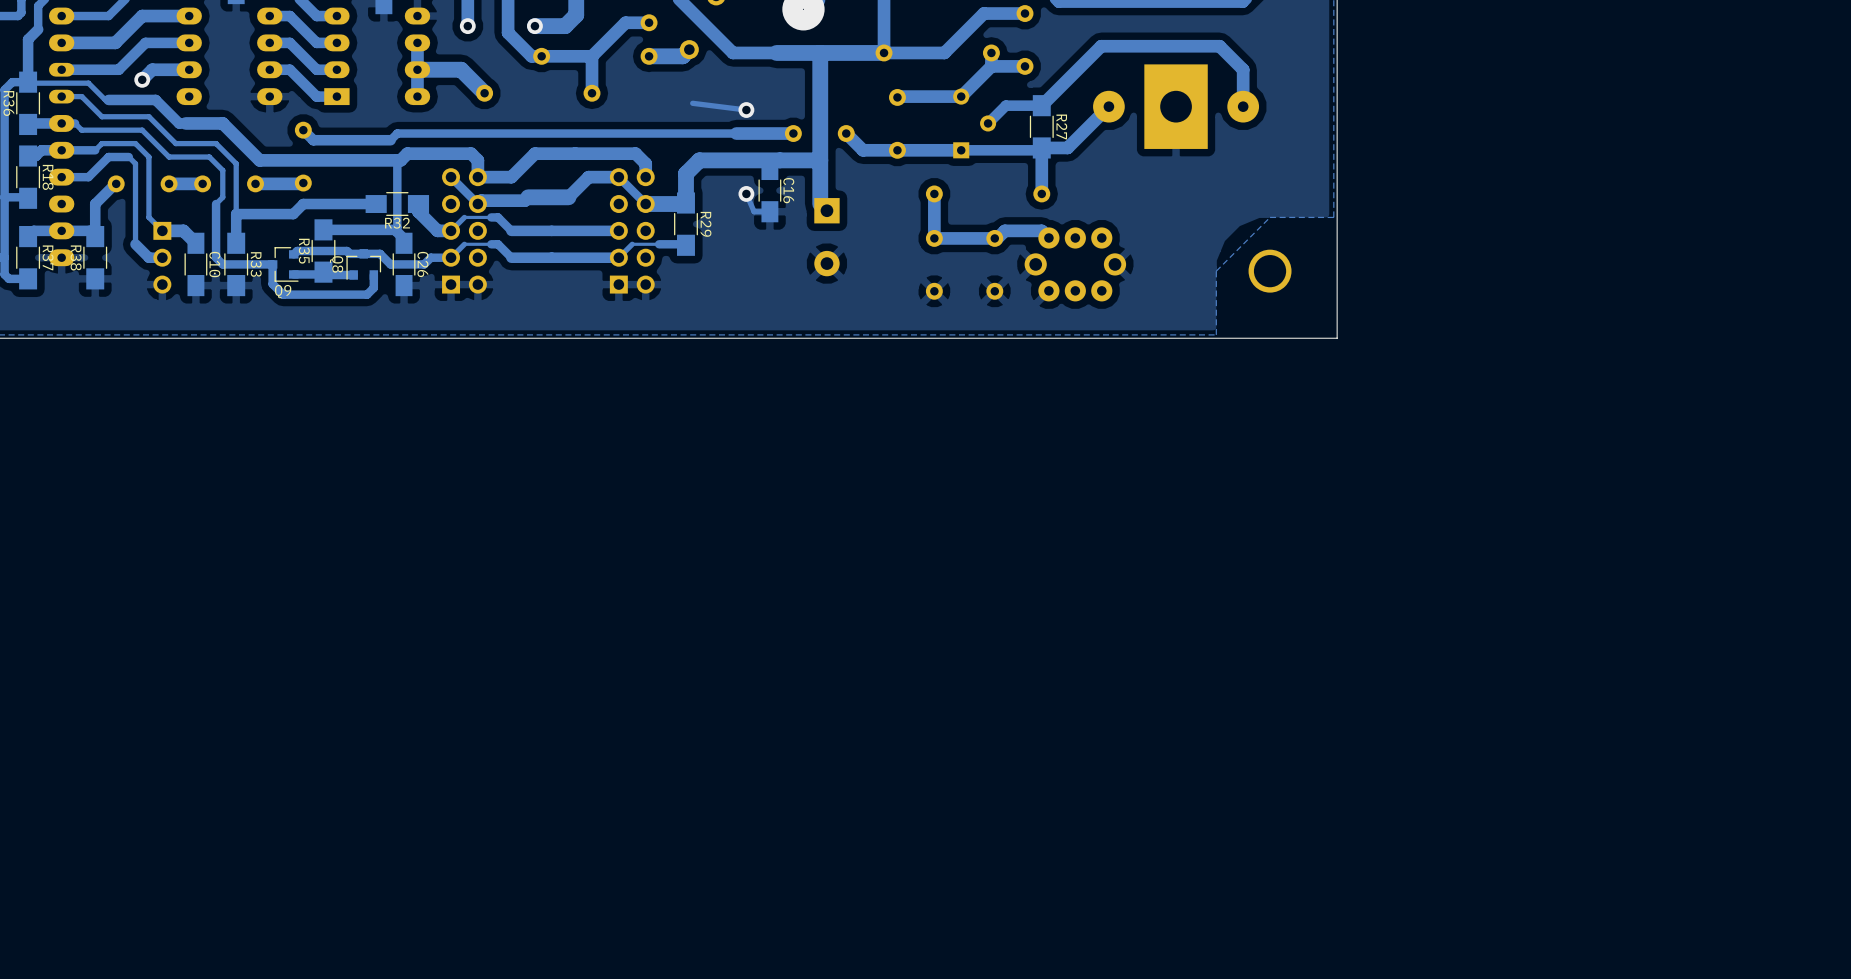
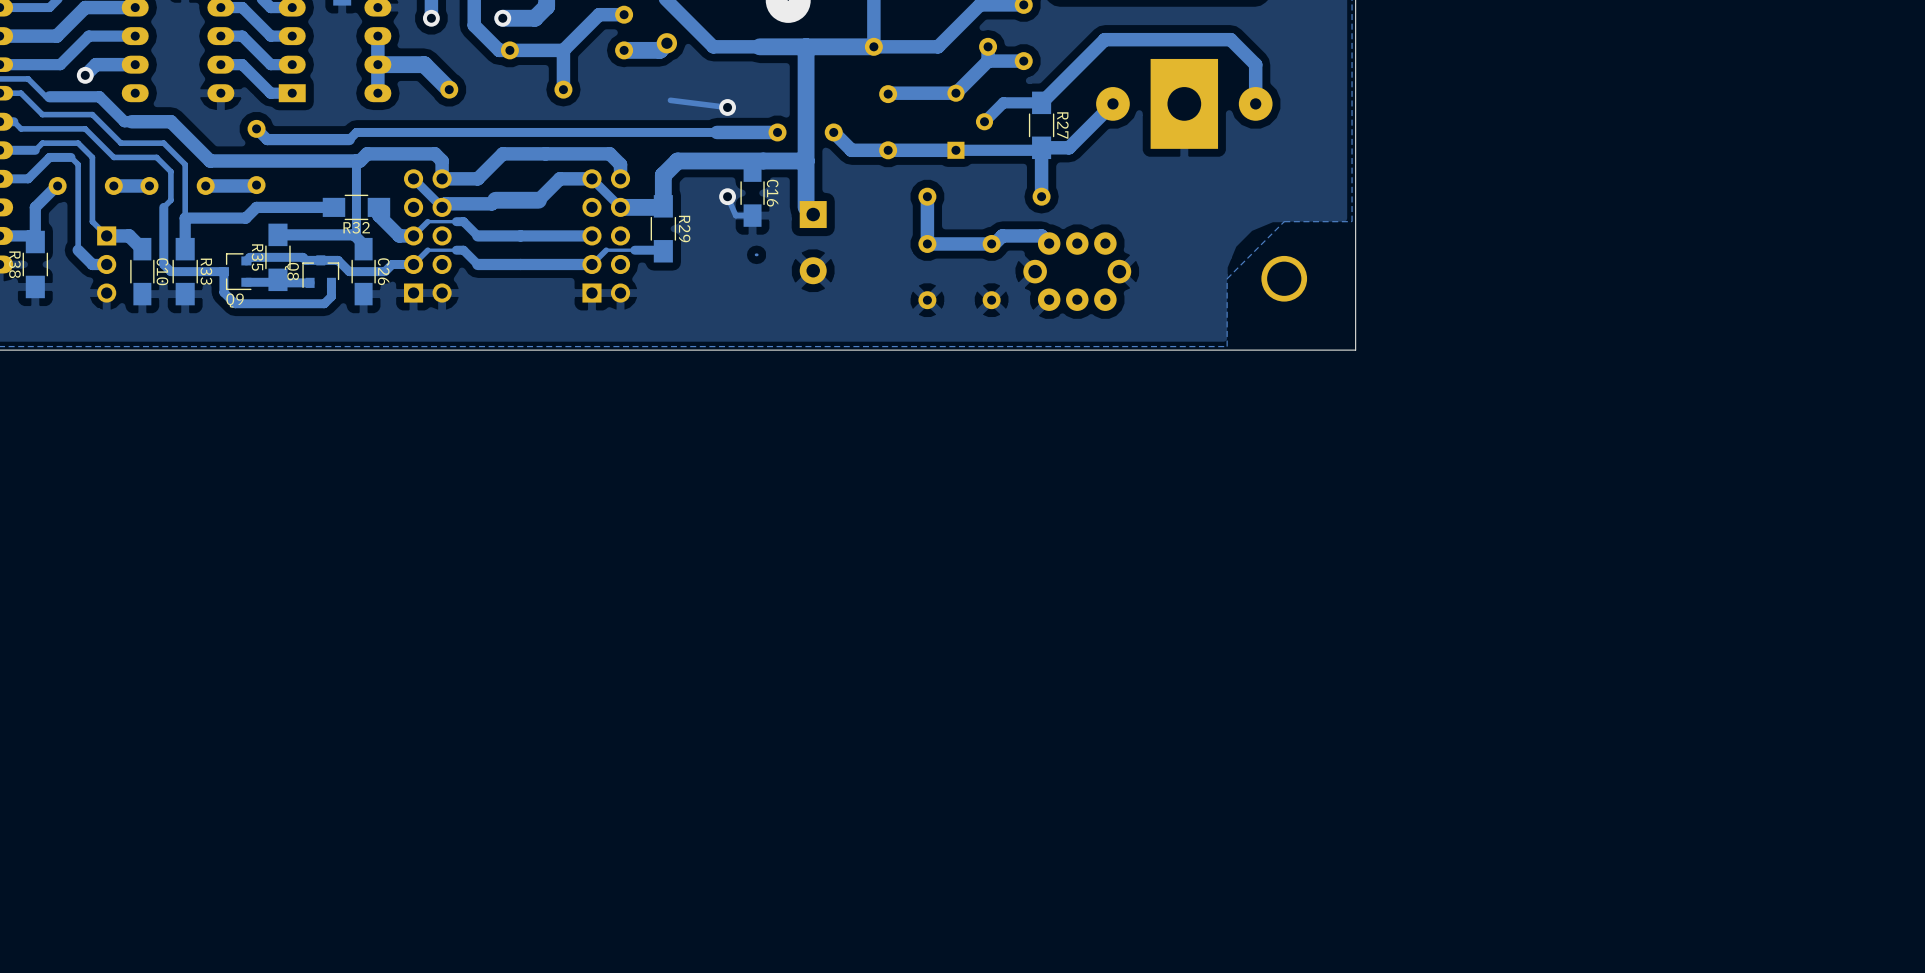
track: none -> (757, 254) (756, 254)

